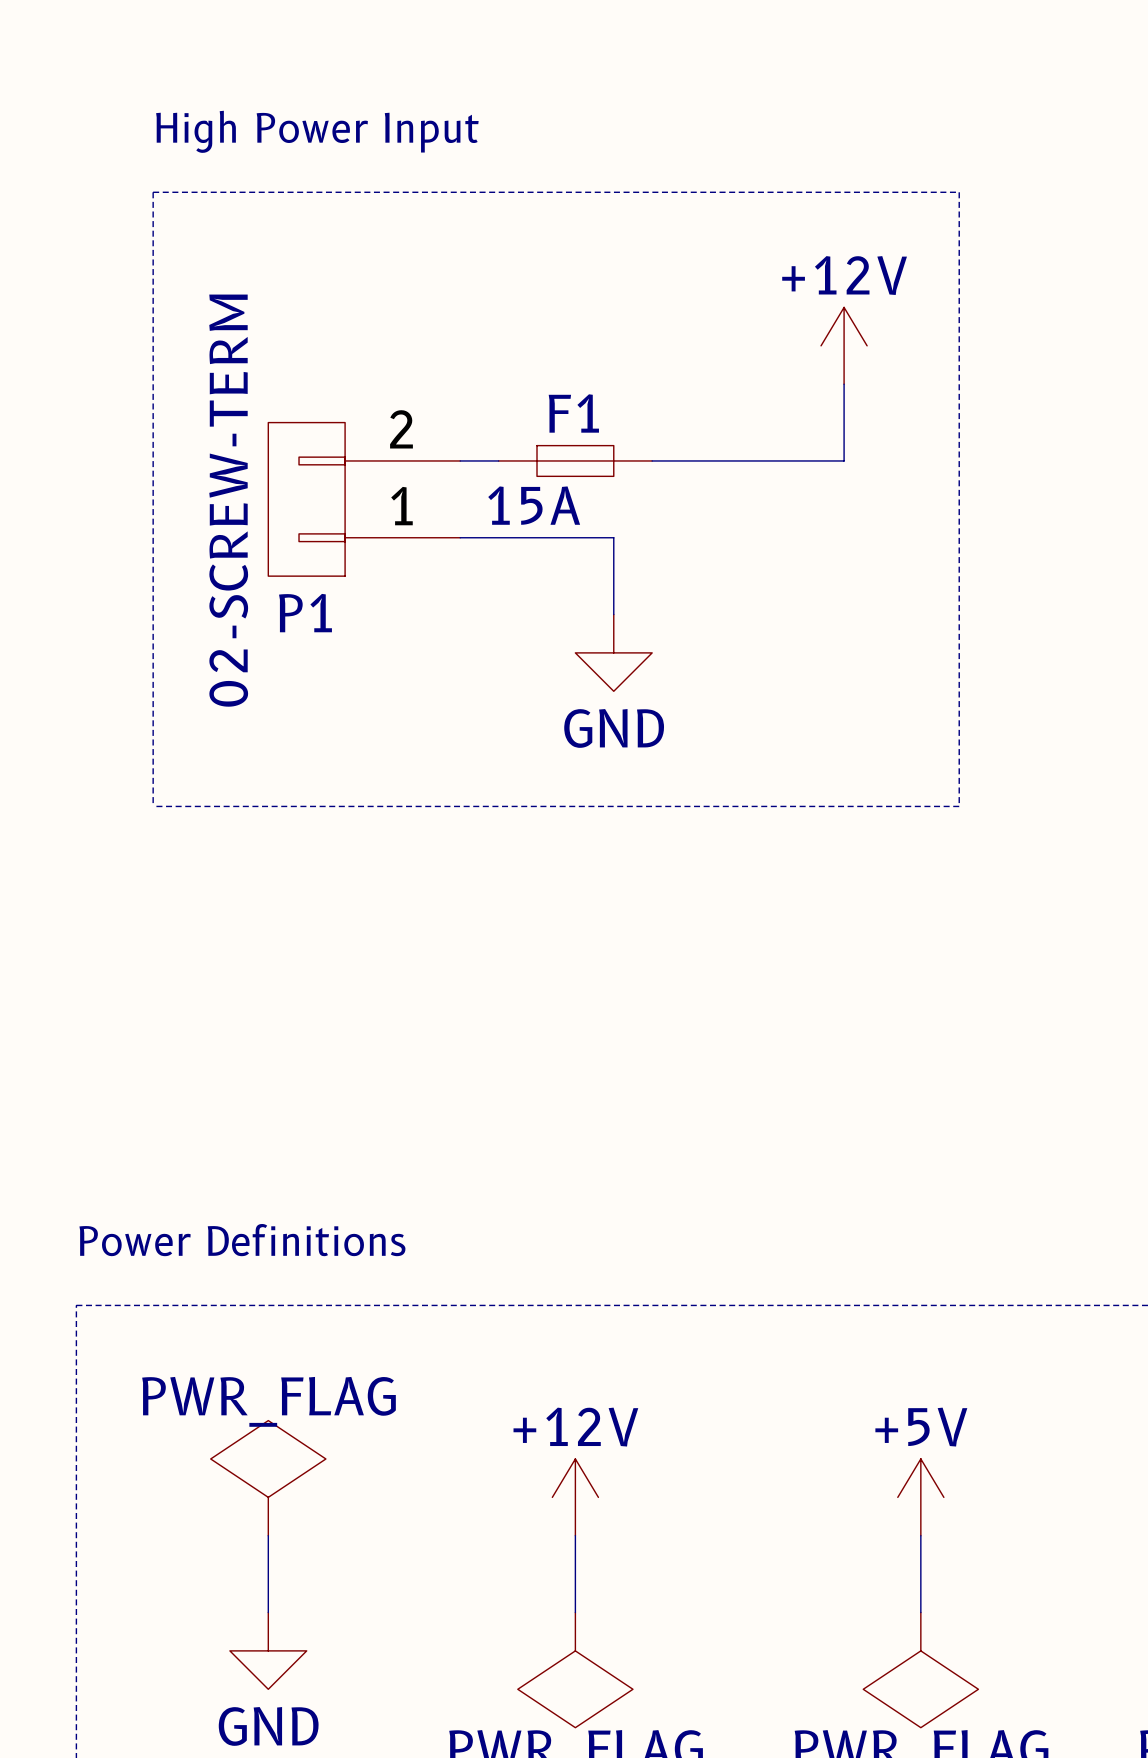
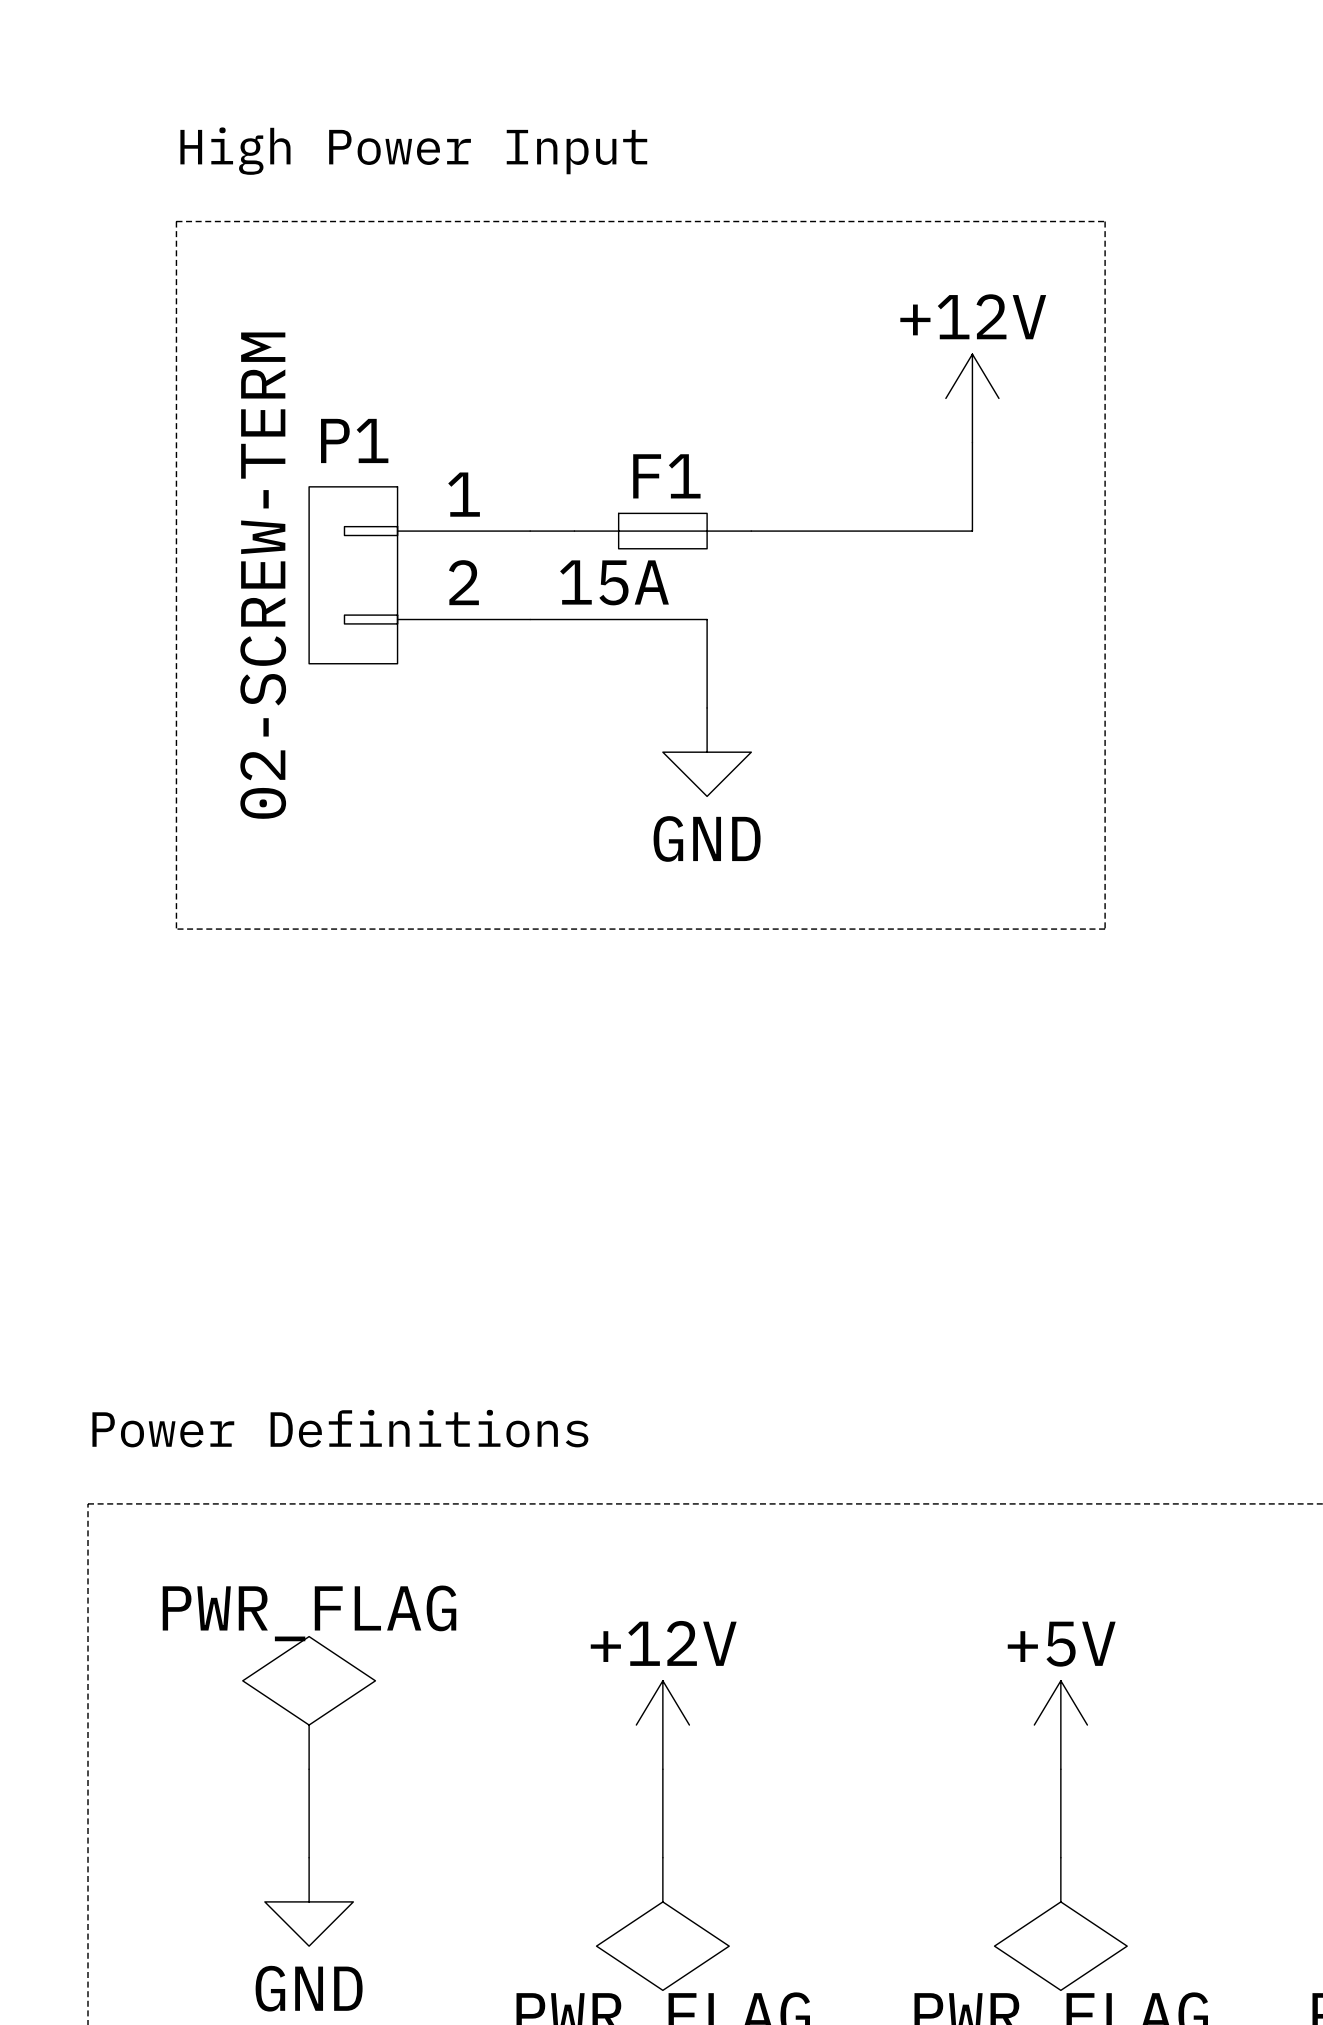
P1 flip: as is (306, 499) -> up-down (353, 575)

